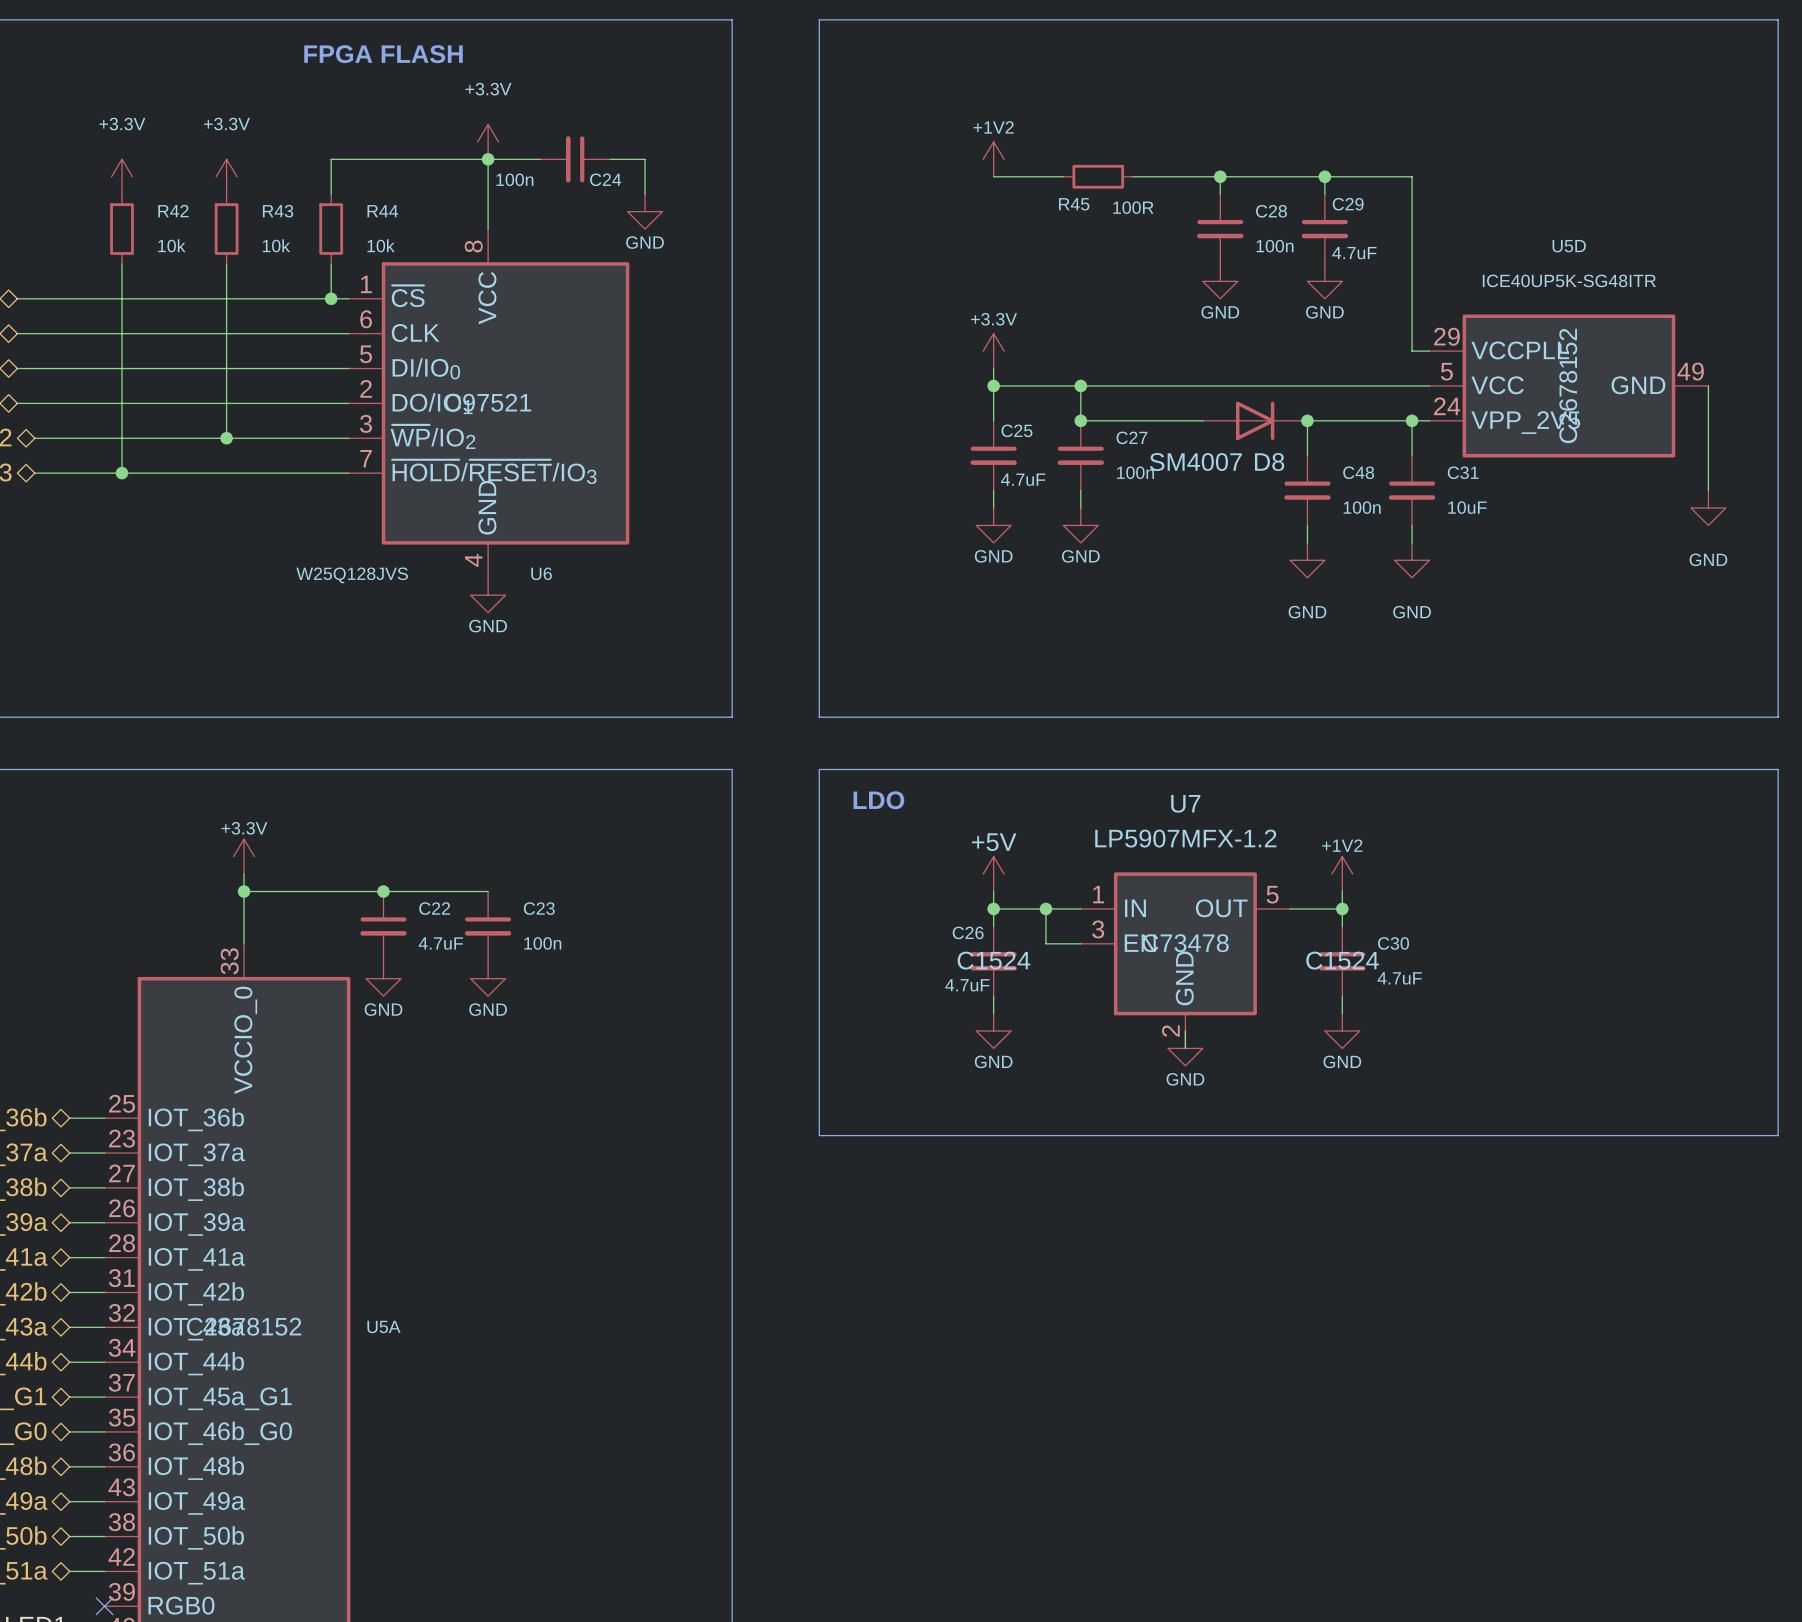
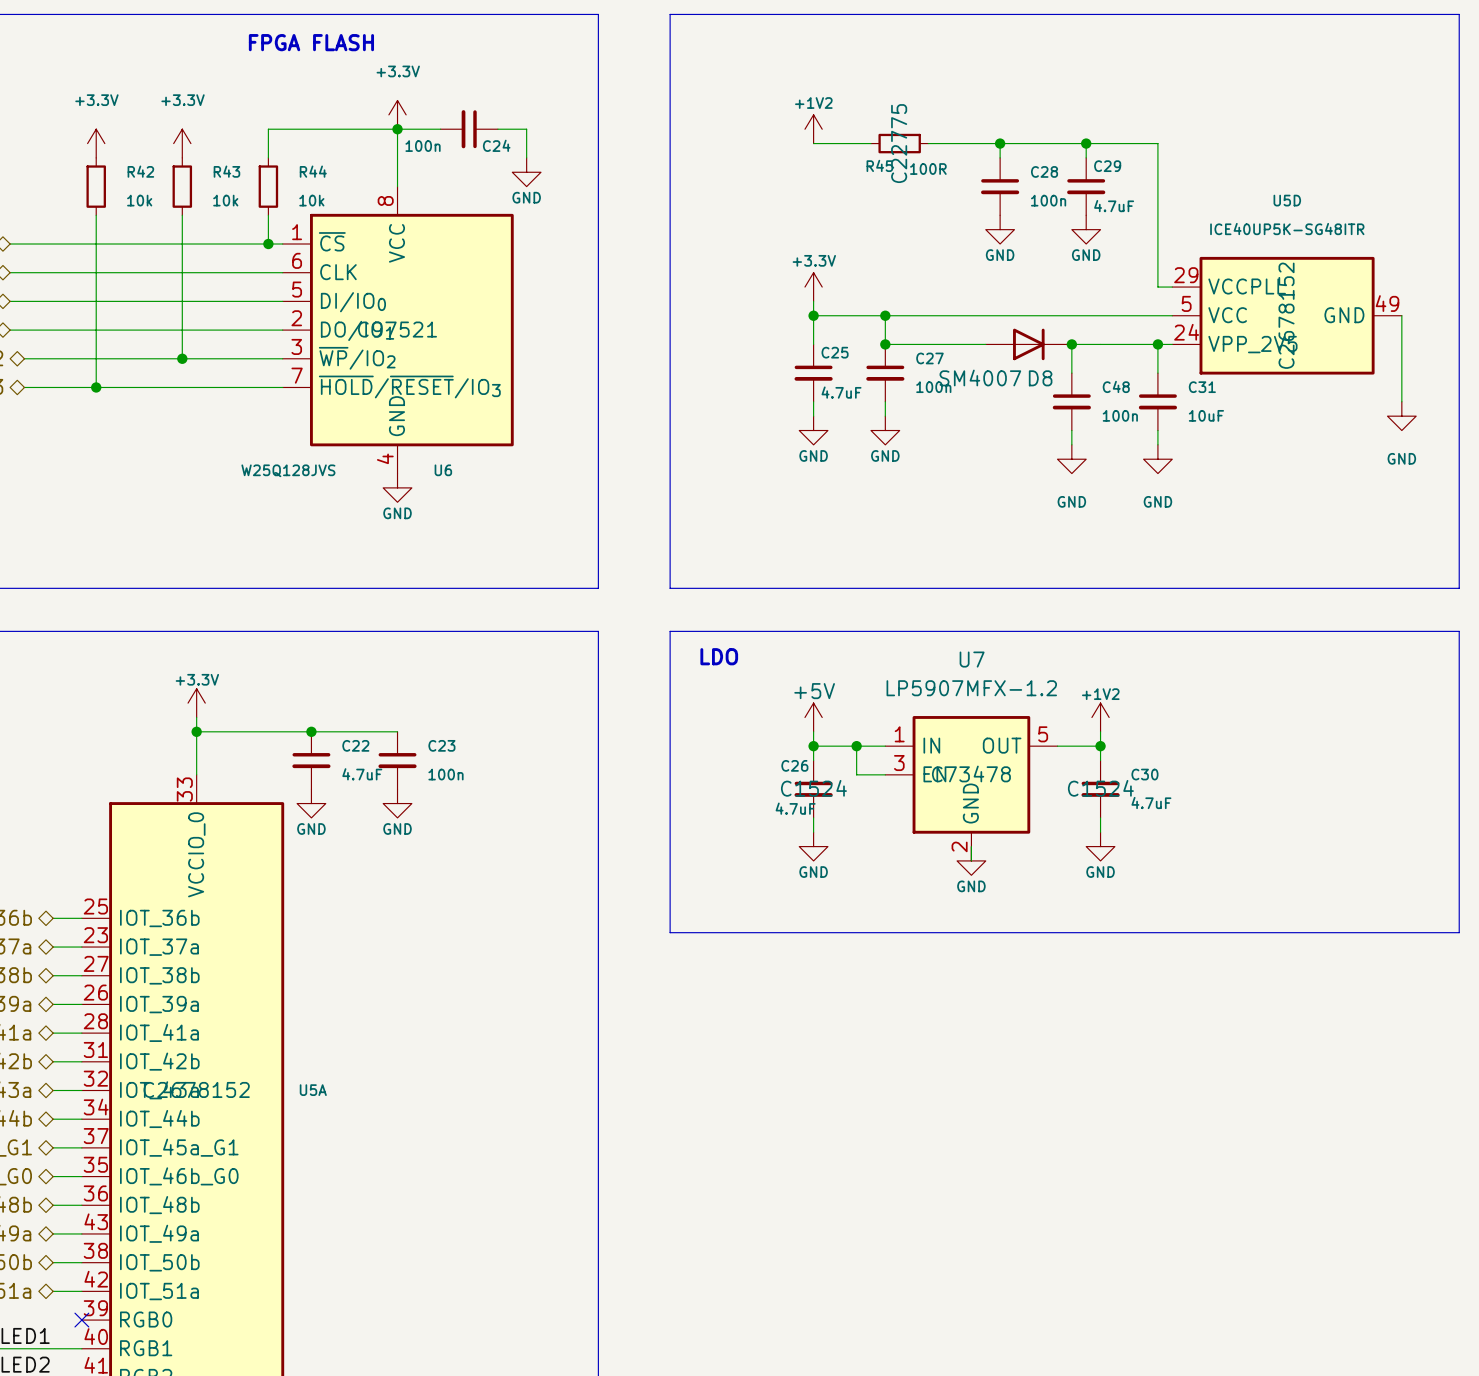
R45 text: none -> C22775 (899, 143)

